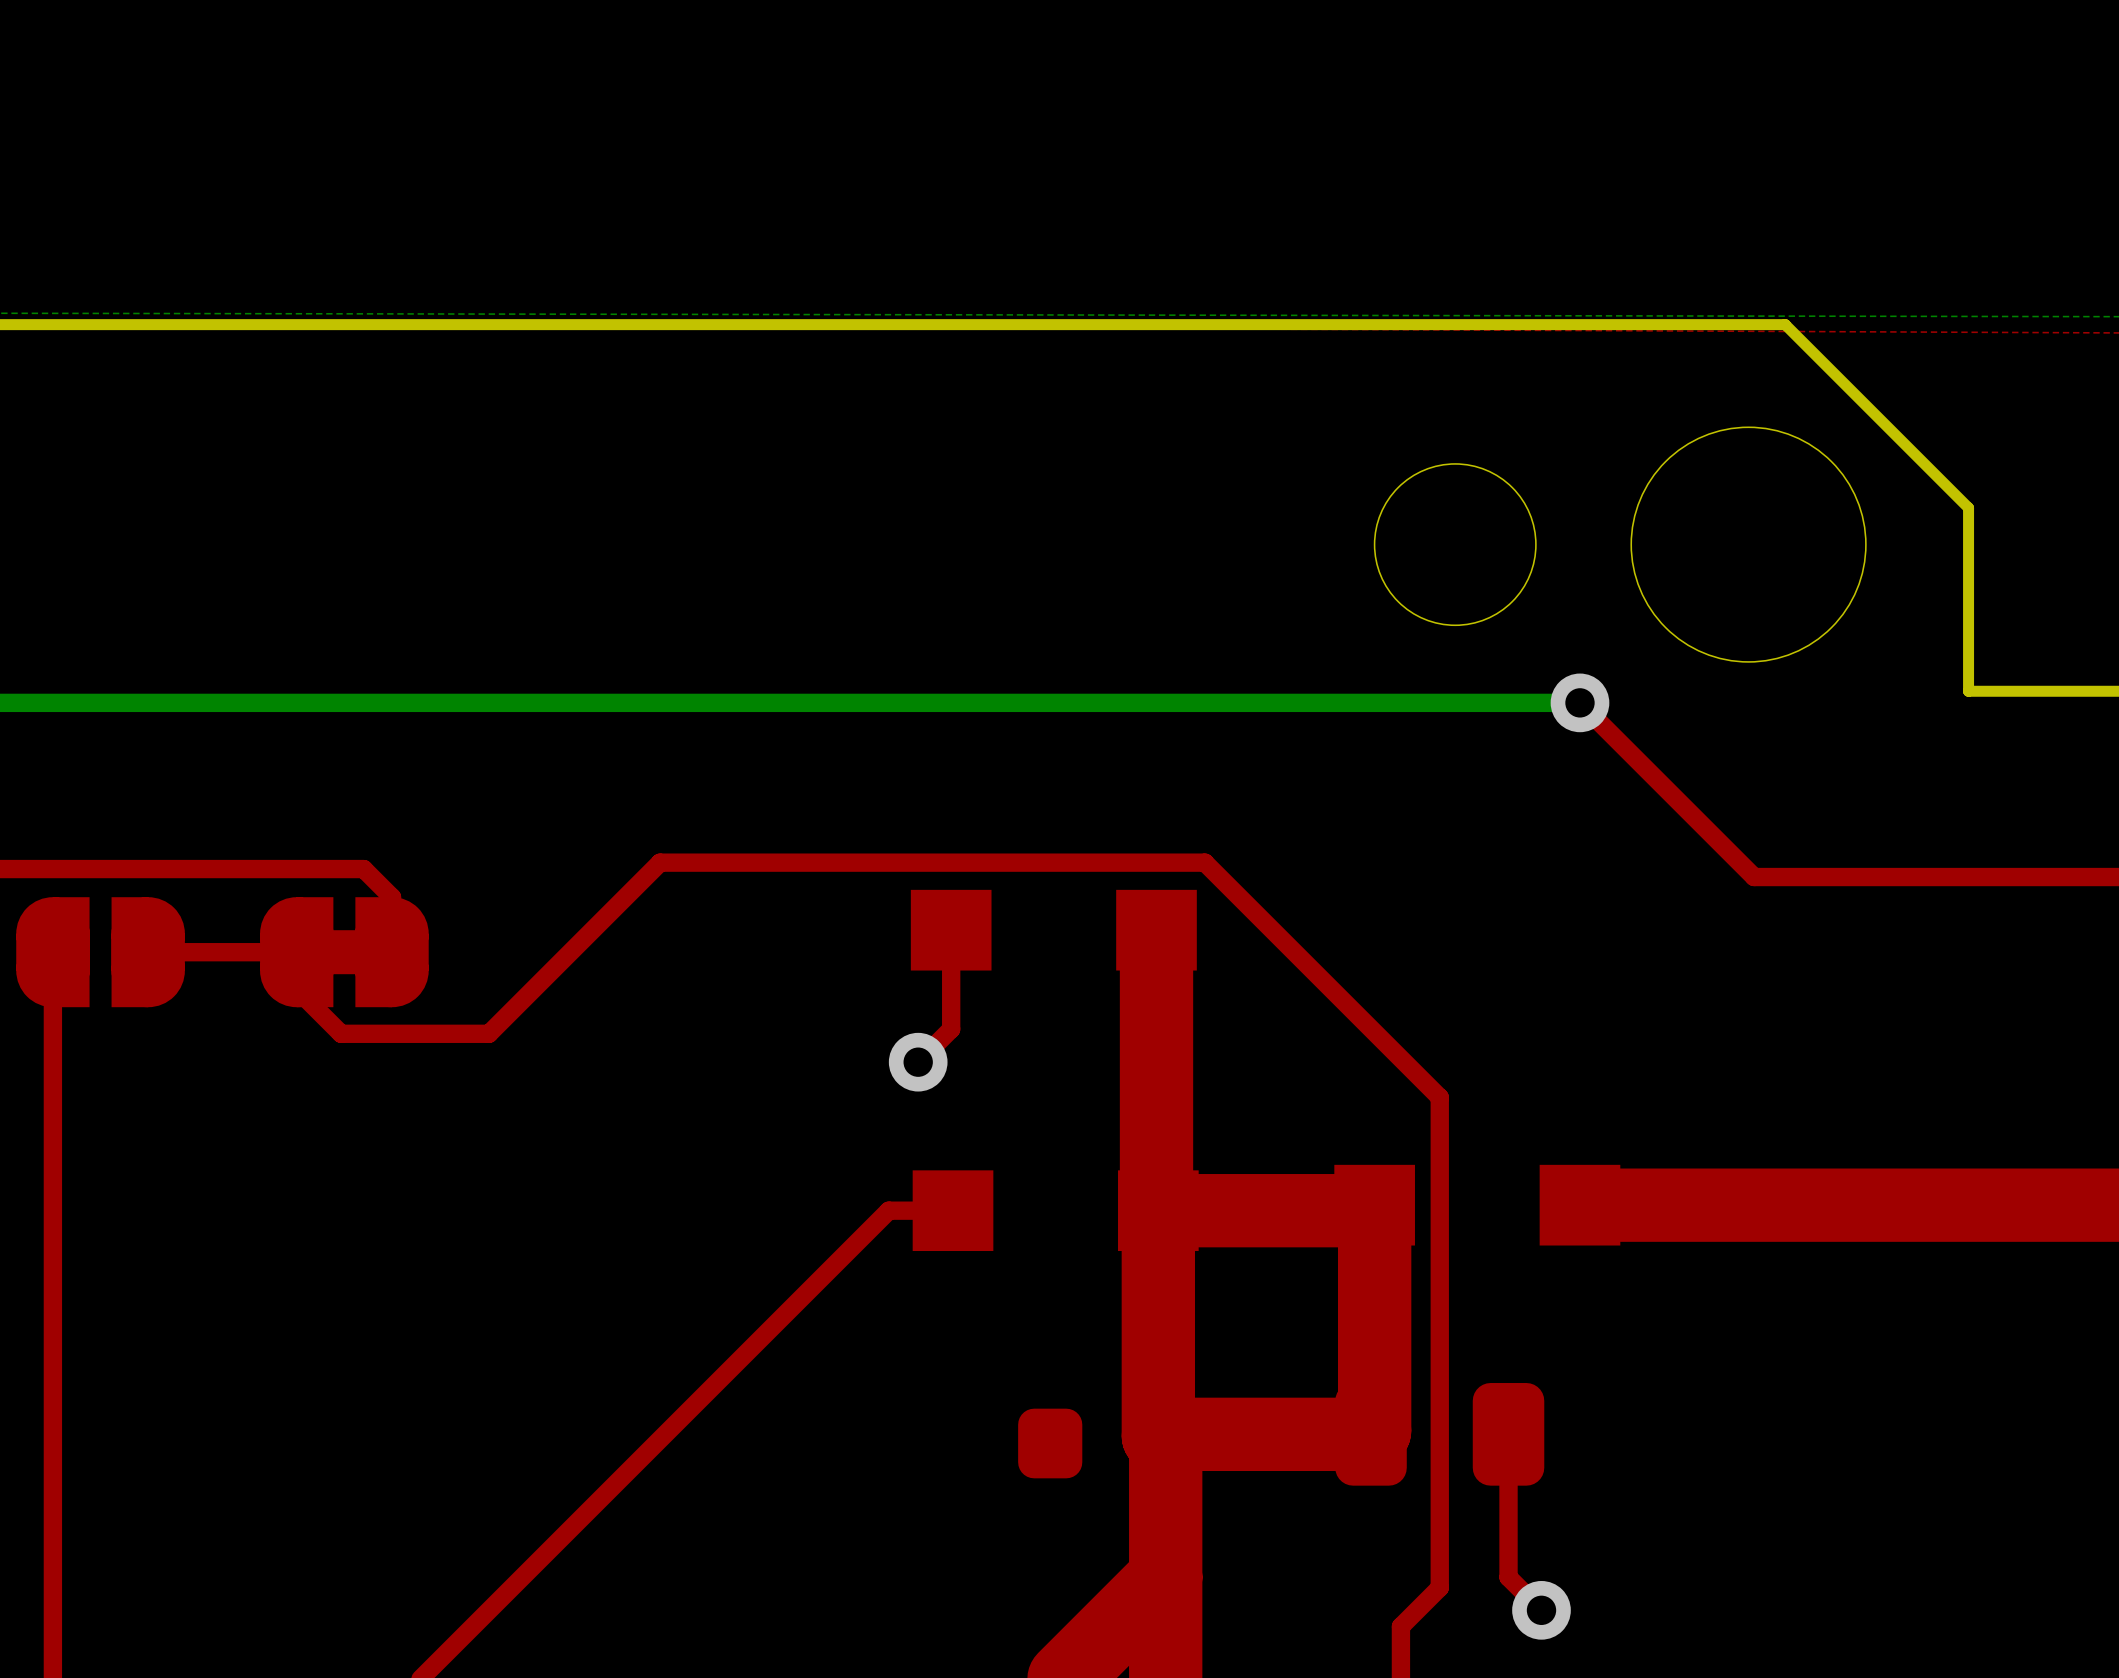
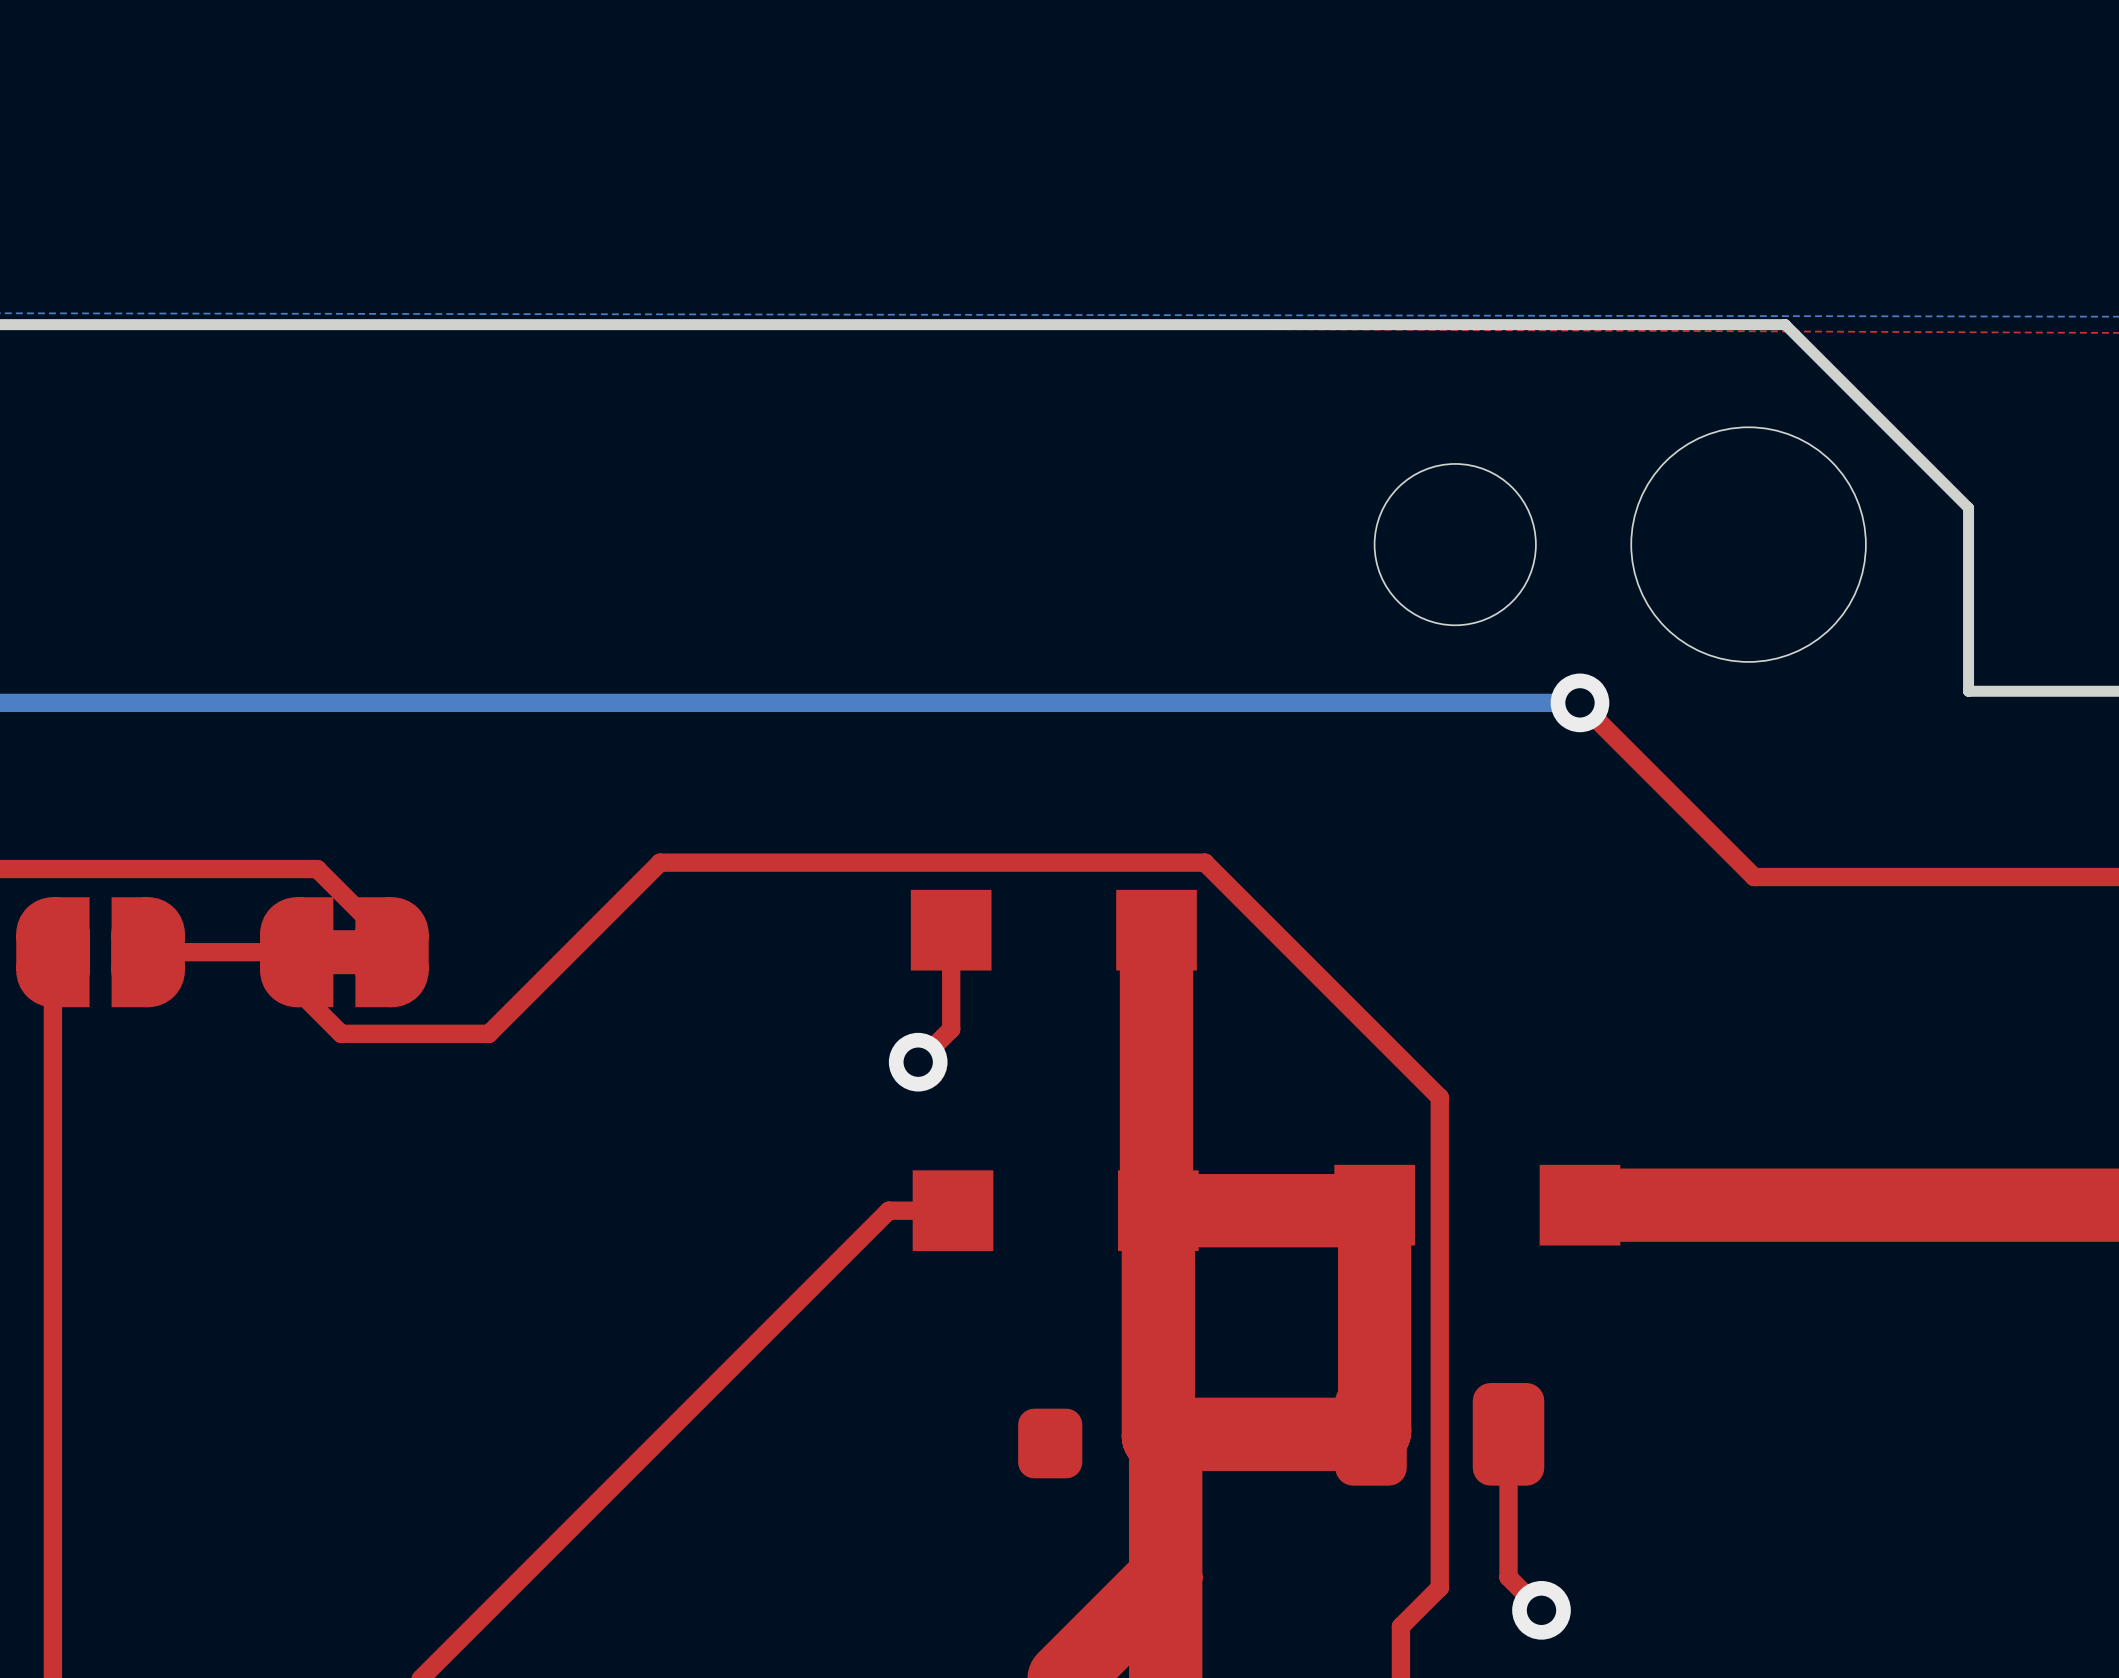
top track: (317, 869) (363, 869) (392, 897) (392, 943) -> (317, 869) (392, 943)

